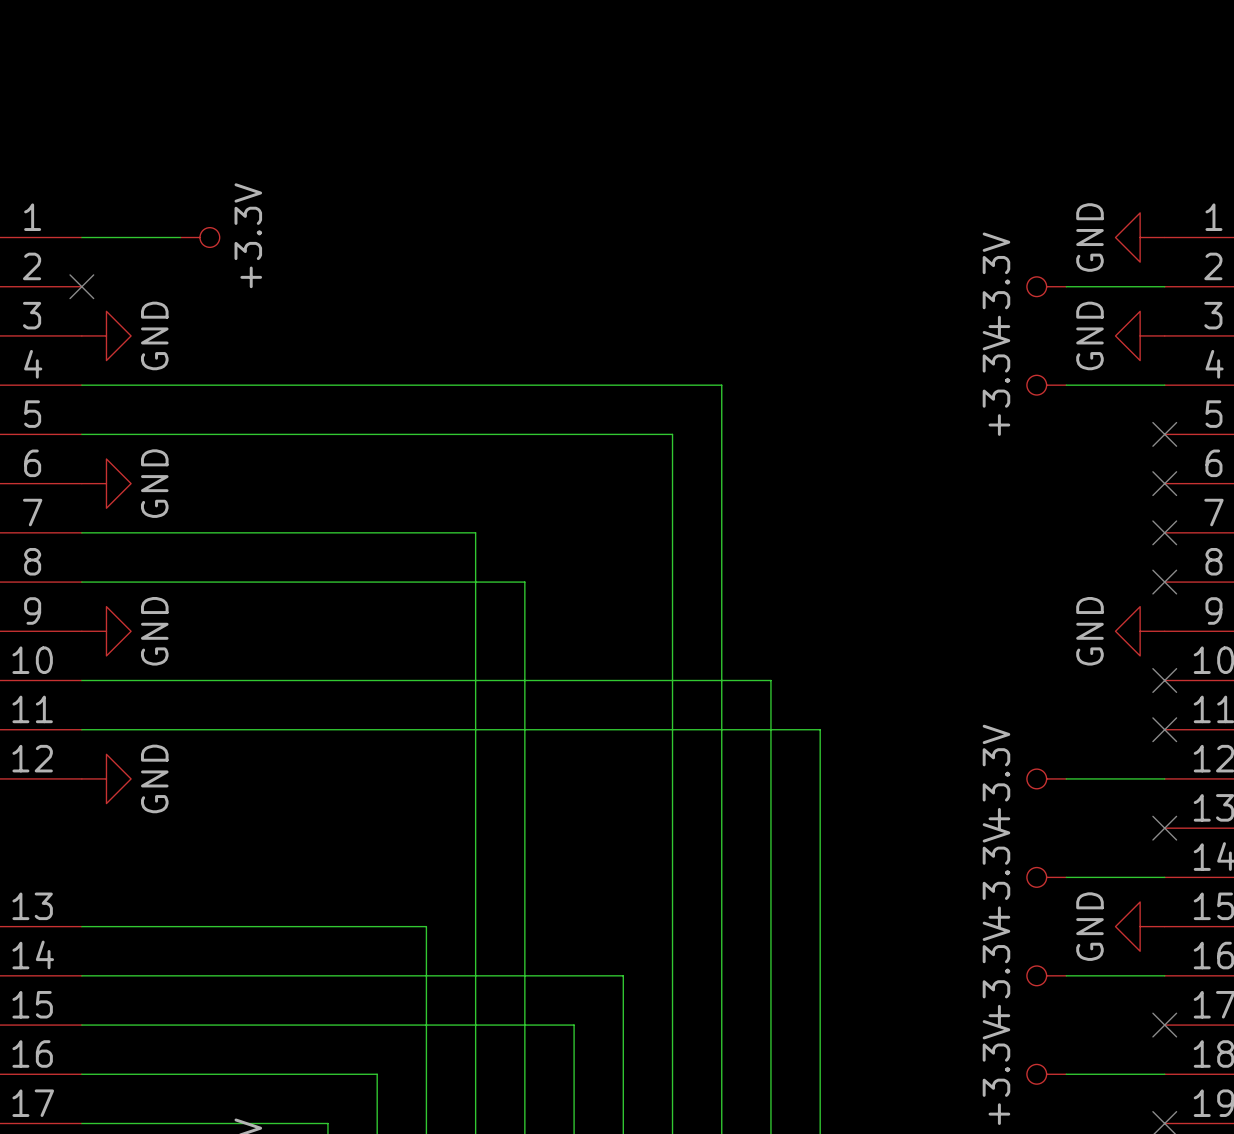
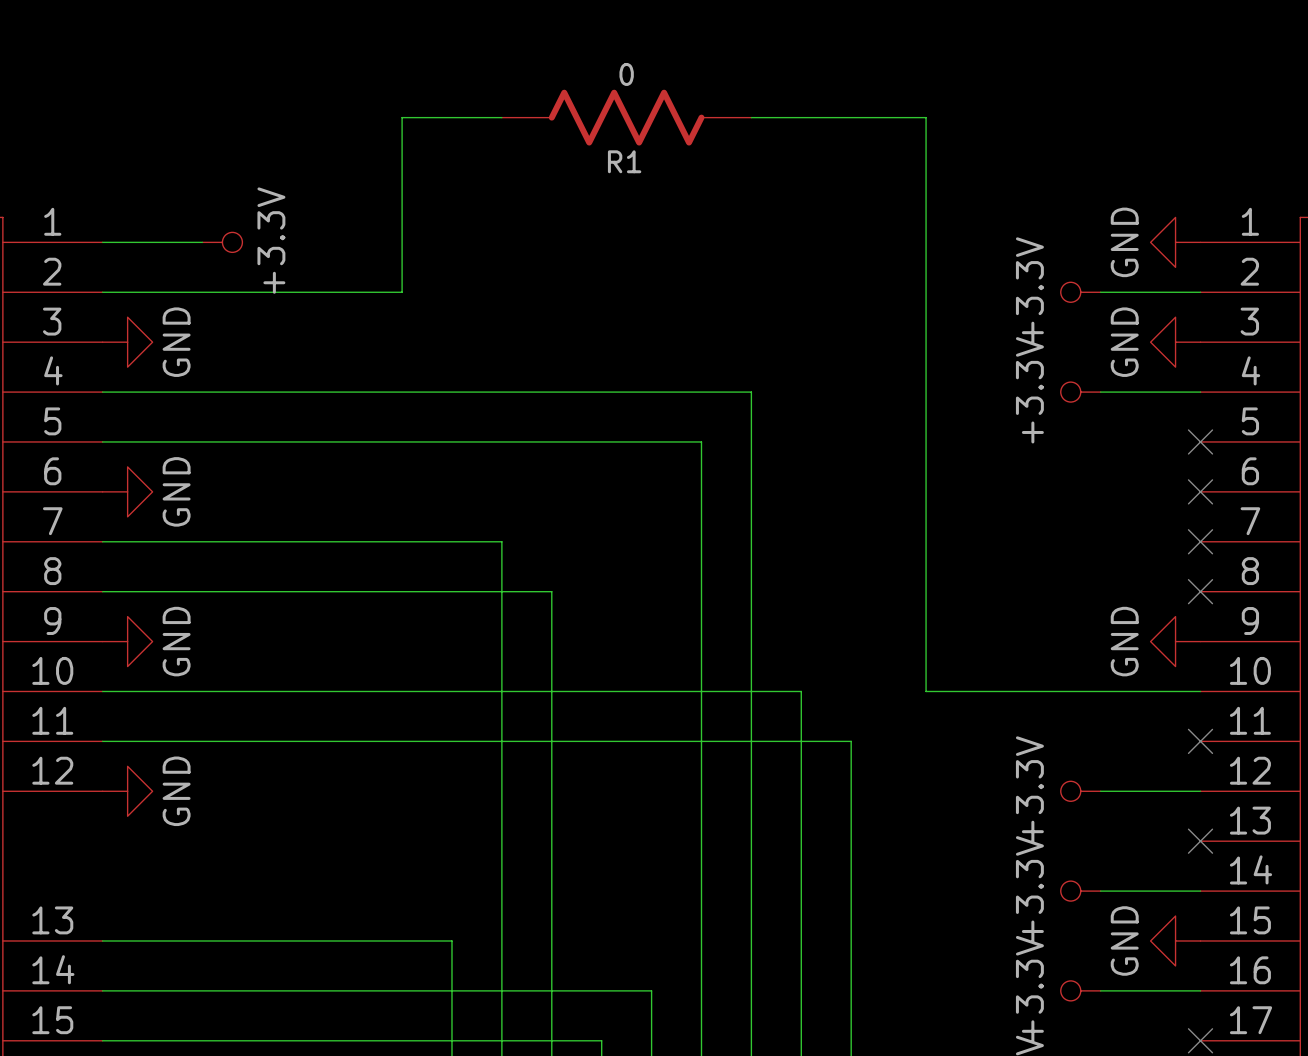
wire: none -> (501, 117) (402, 117) (402, 292) (102, 292)
R1: none -> 0 (626, 117)
wire: none -> (751, 117) (926, 117) (926, 691) (1200, 691)
no-connect mark: (81, 286) -> none
no-connect mark: (1164, 680) -> none

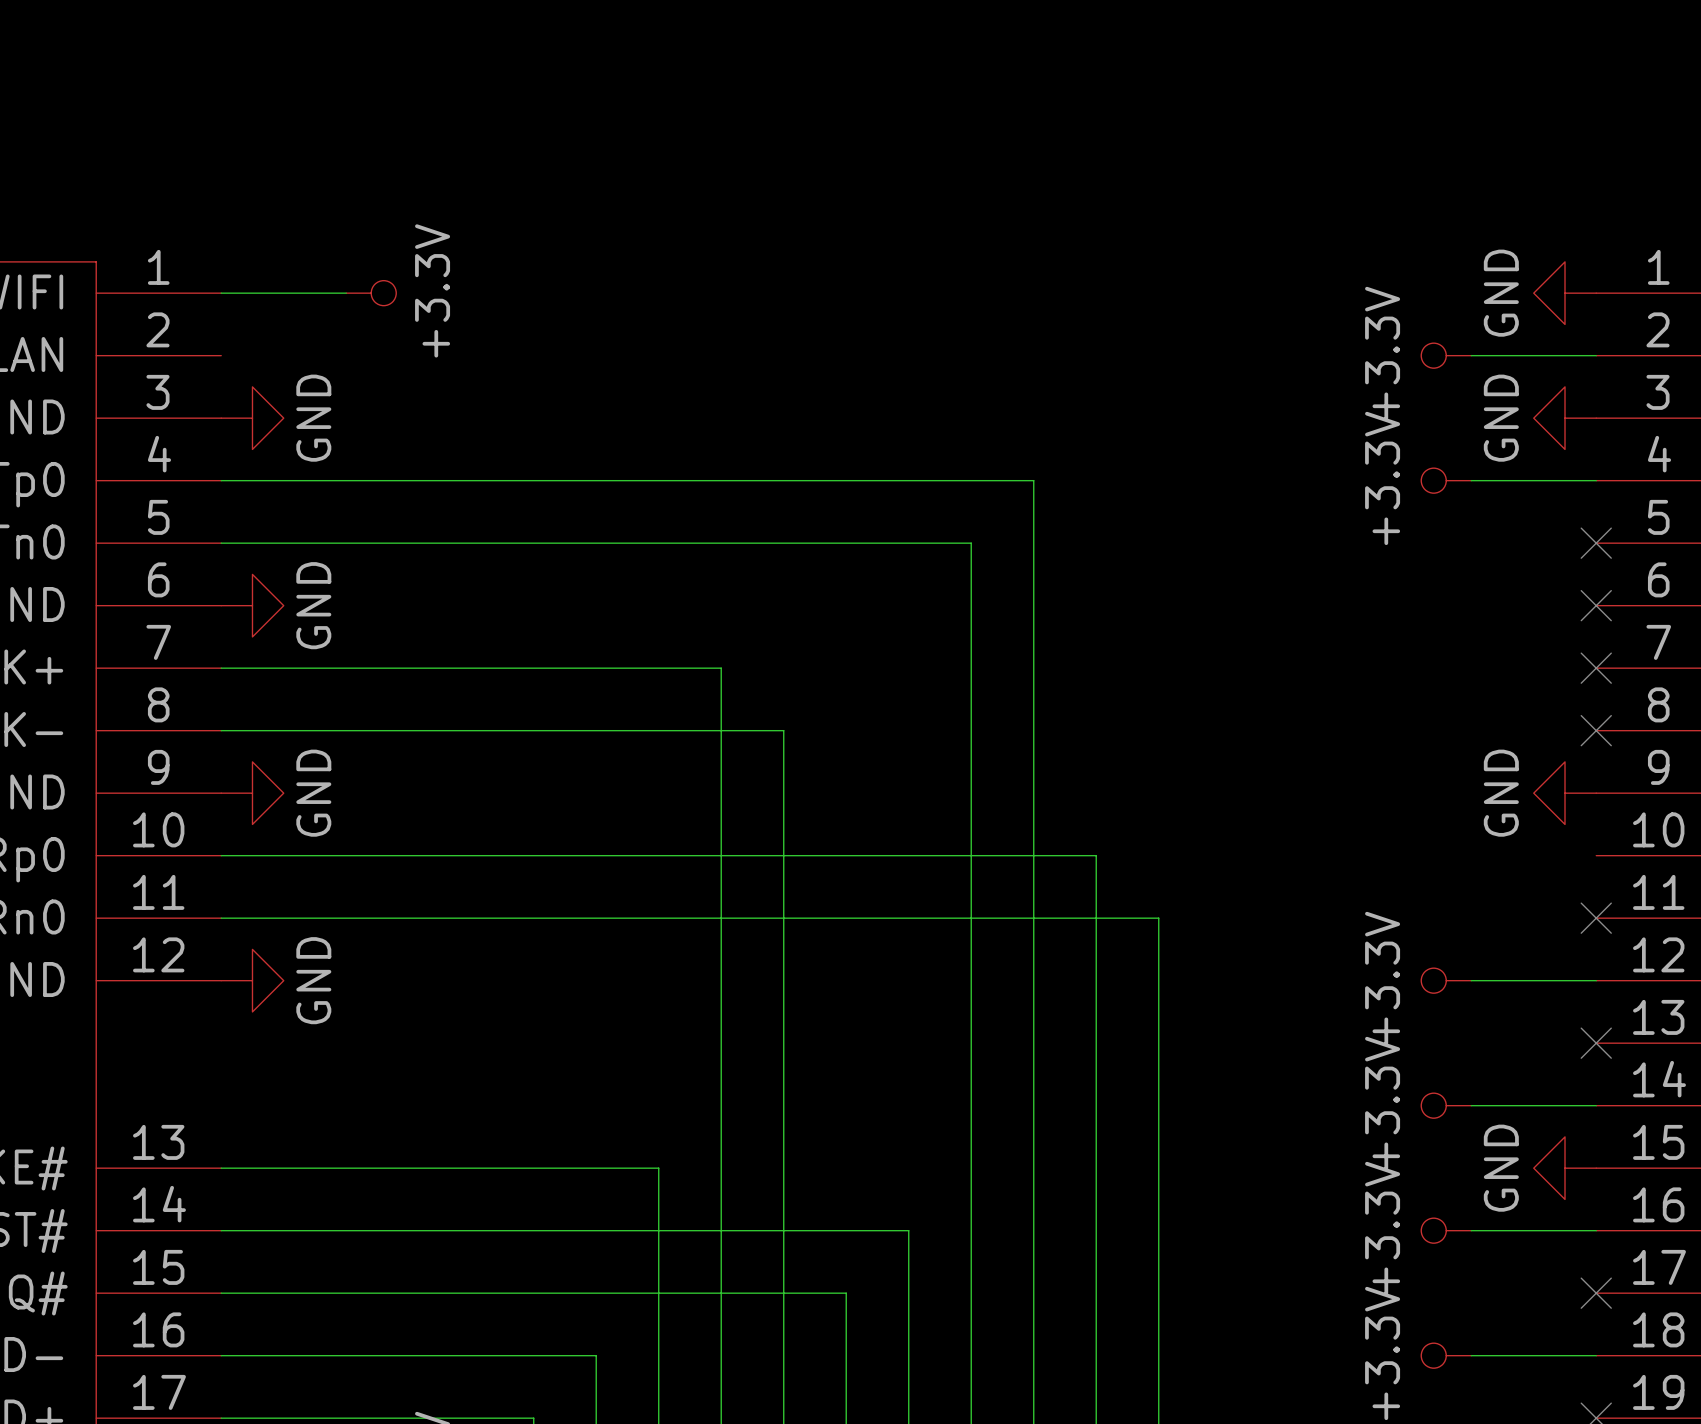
wire: (501, 117) (402, 117) (402, 292) (102, 292) -> none
R1: 0 (626, 117) -> none
wire: (751, 117) (926, 117) (926, 691) (1200, 691) -> none

